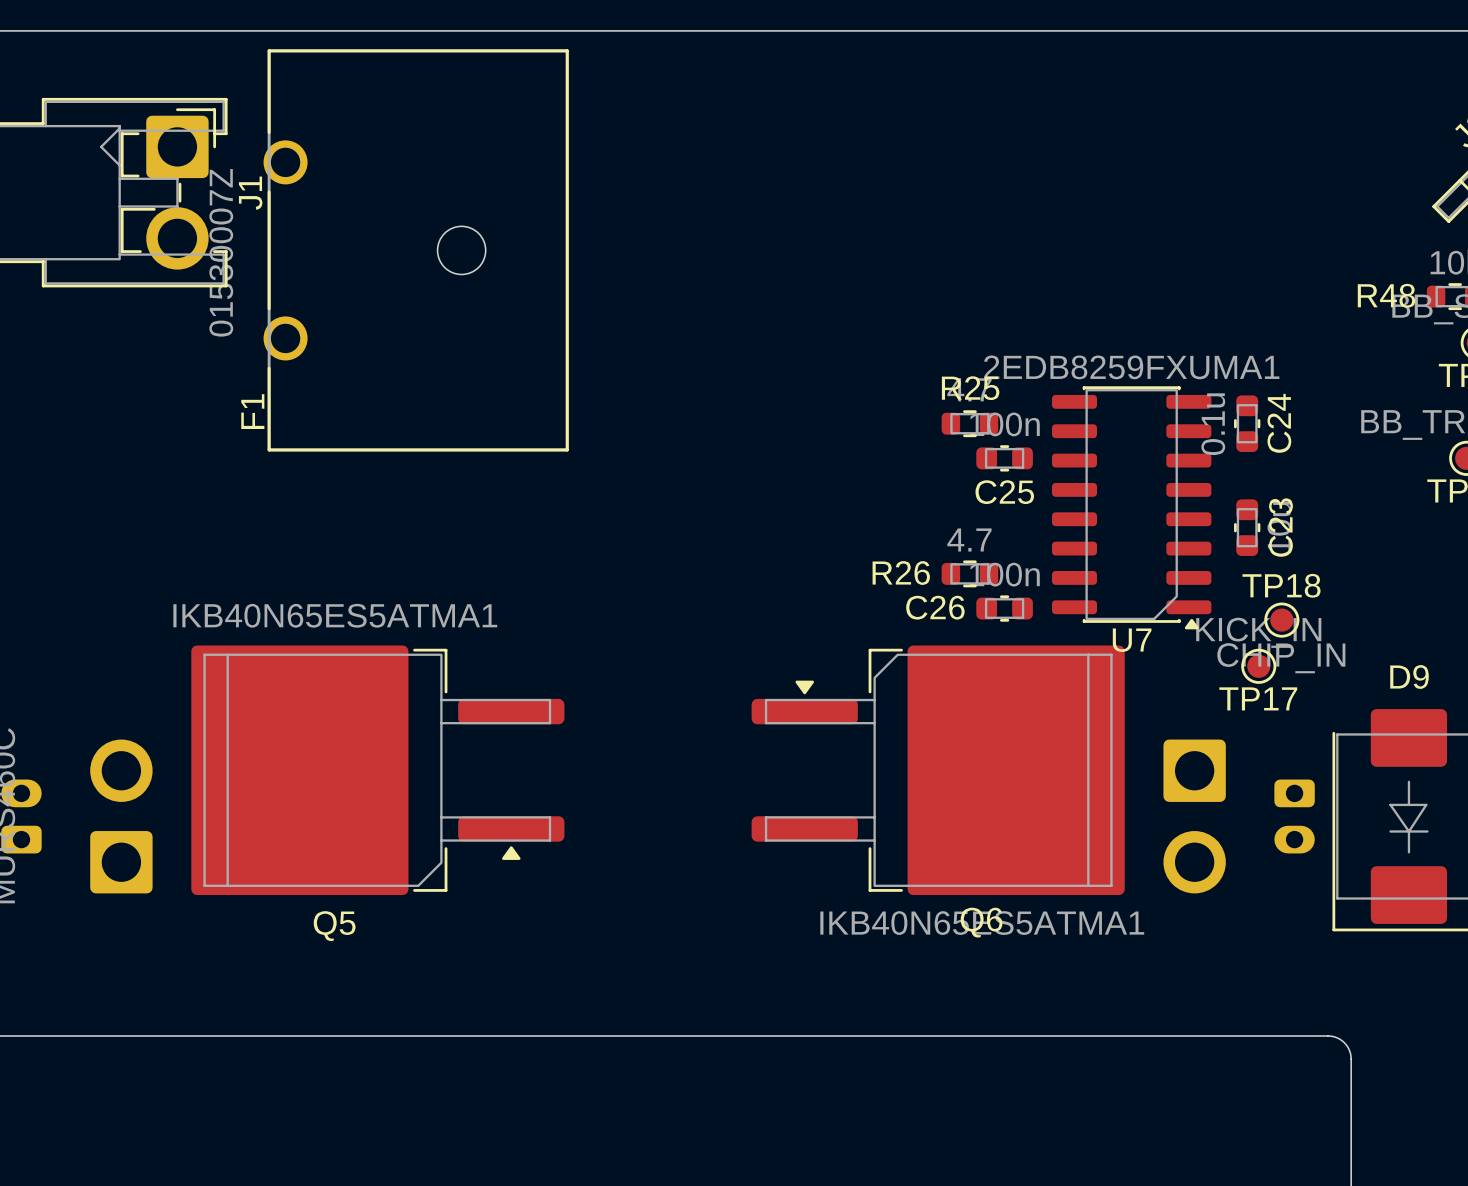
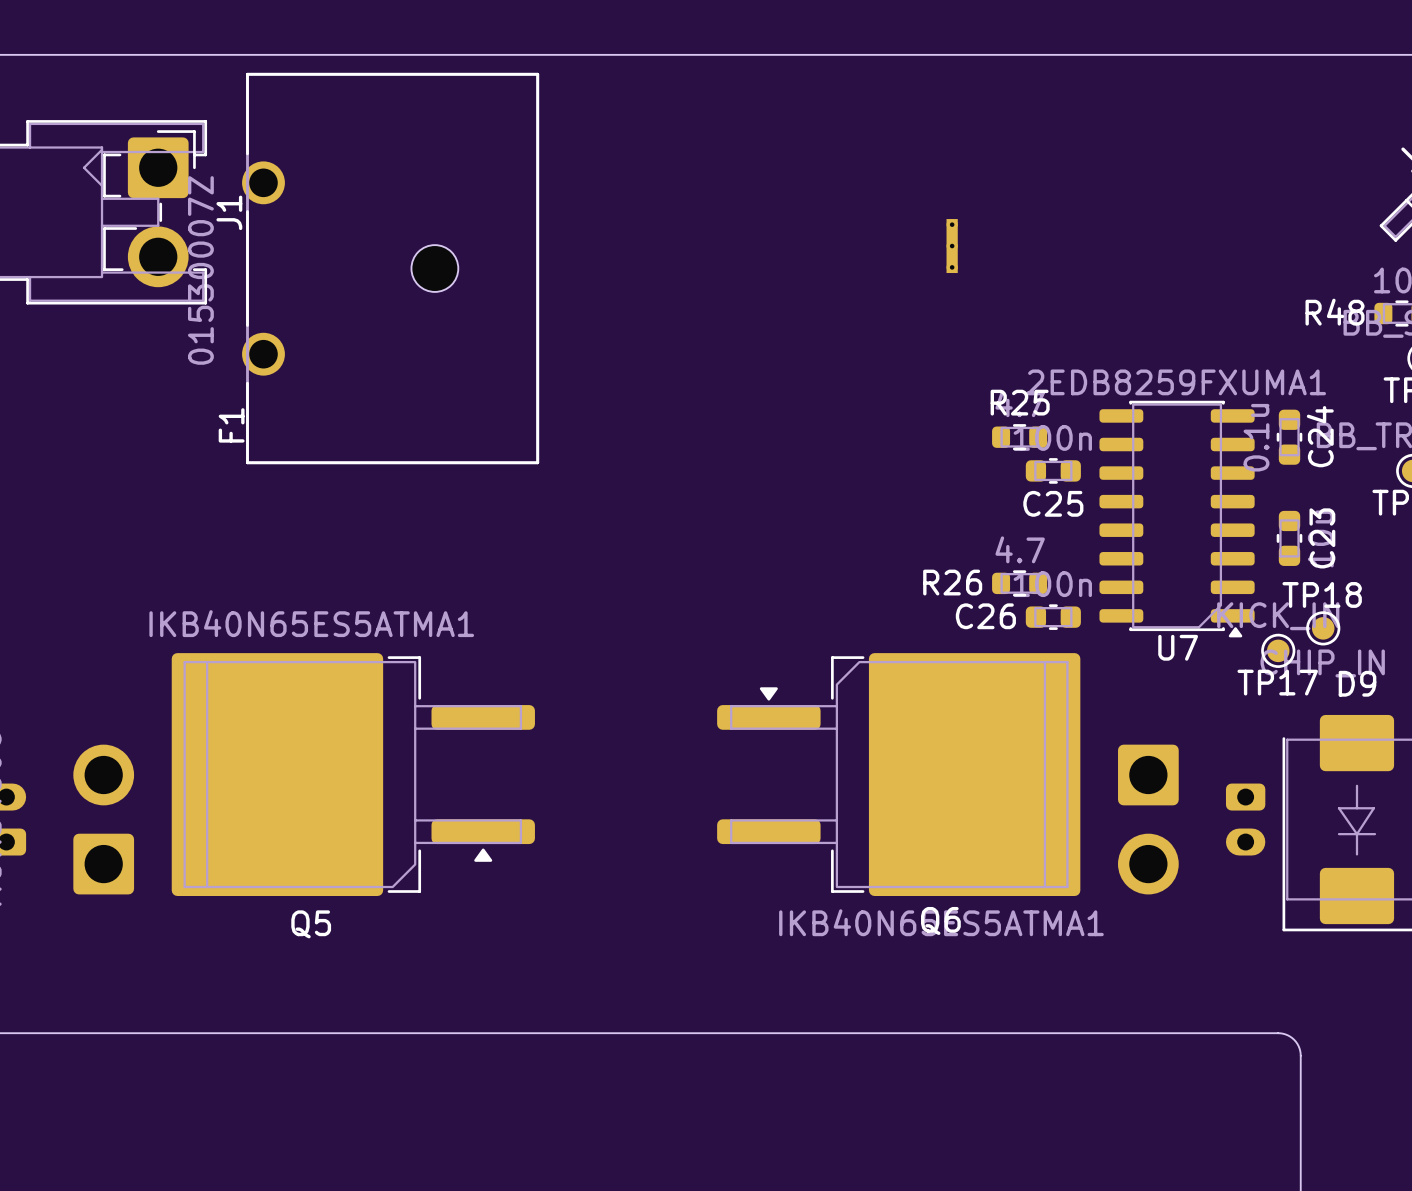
part: none -> (952, 246)
R25 position: (969, 423) -> (1019, 437)
C24 position: (1247, 423) -> (1289, 437)
C25 position: (1004, 458) -> (1053, 470)
U7 position: (1131, 507) -> (1177, 519)
C23 position: (1247, 527) -> (1289, 538)
R26 position: (969, 573) -> (1019, 583)
C26 position: (1004, 608) -> (1053, 617)
TP18 position: (1281, 620) -> (1323, 628)
TP17 position: (1258, 666) -> (1278, 650)

